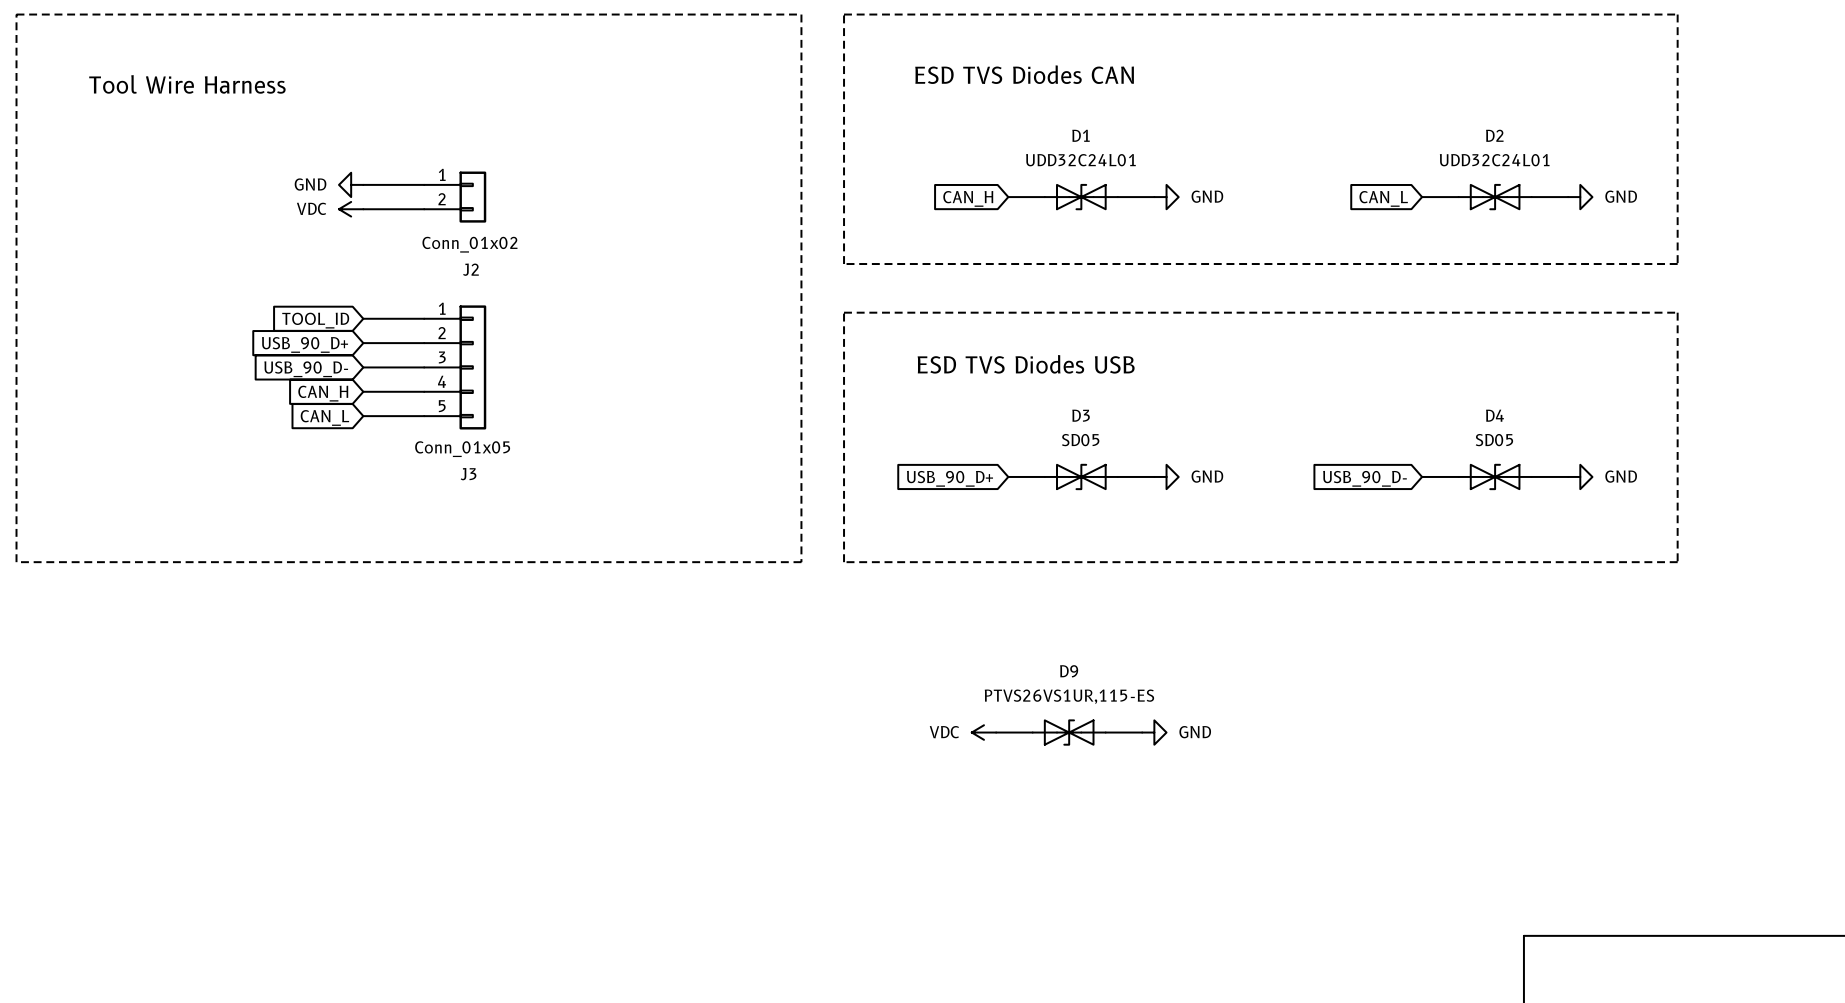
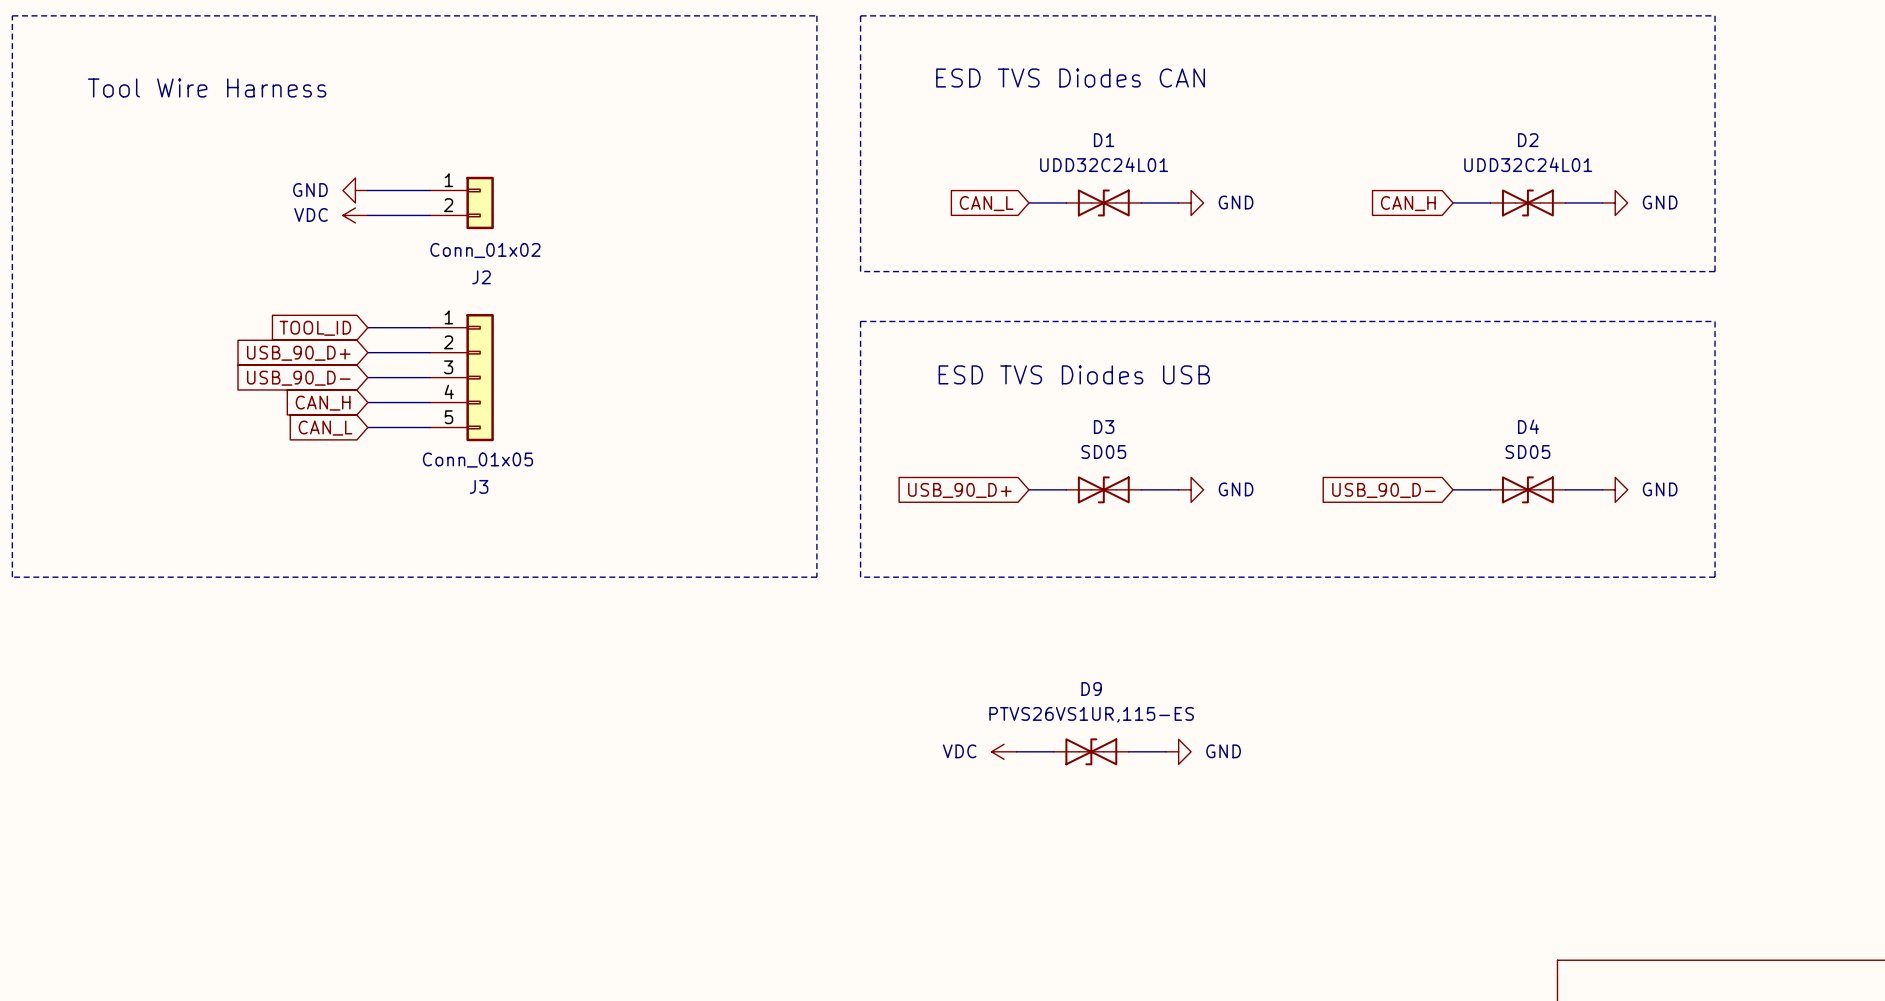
global label: CAN_H (968, 198) -> CAN_L (986, 203)
global label: CAN_L (1383, 198) -> CAN_H (1408, 203)

